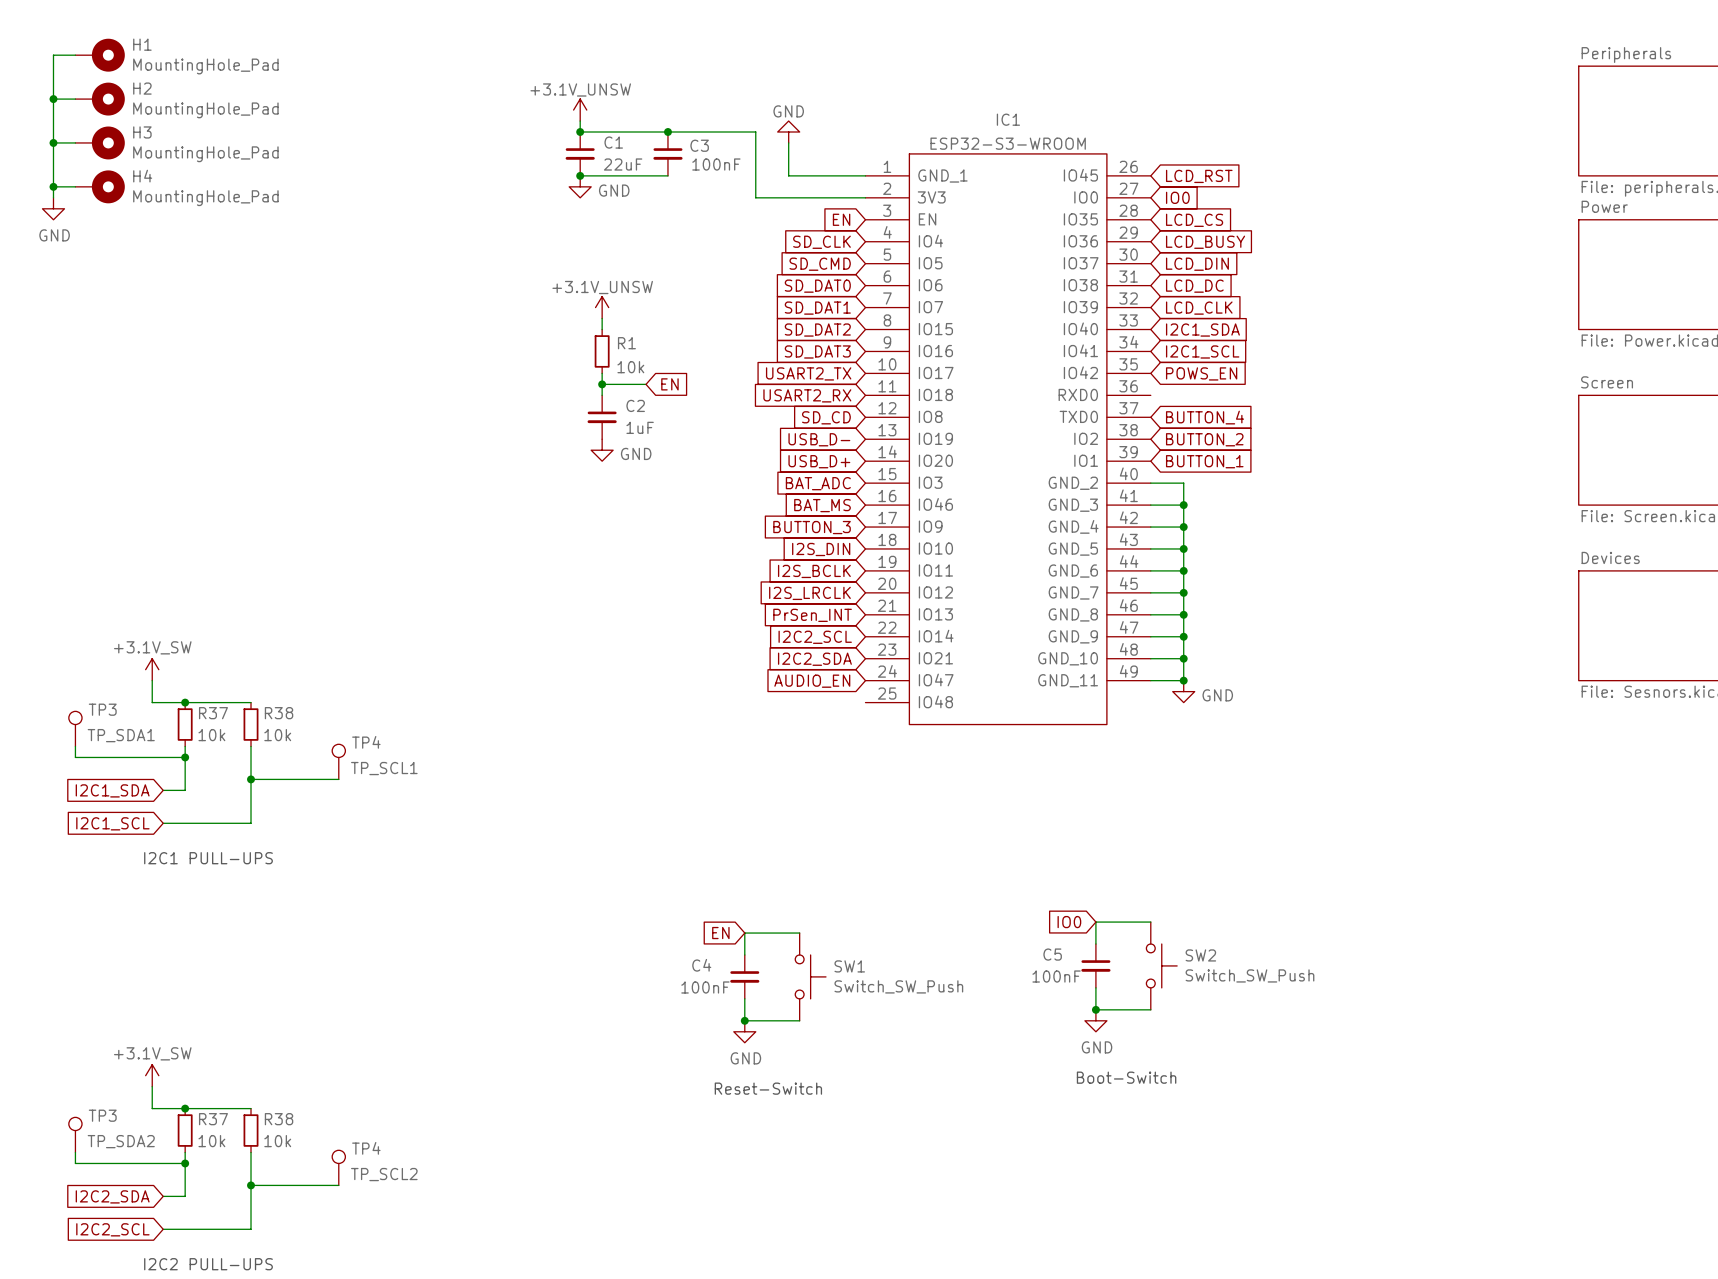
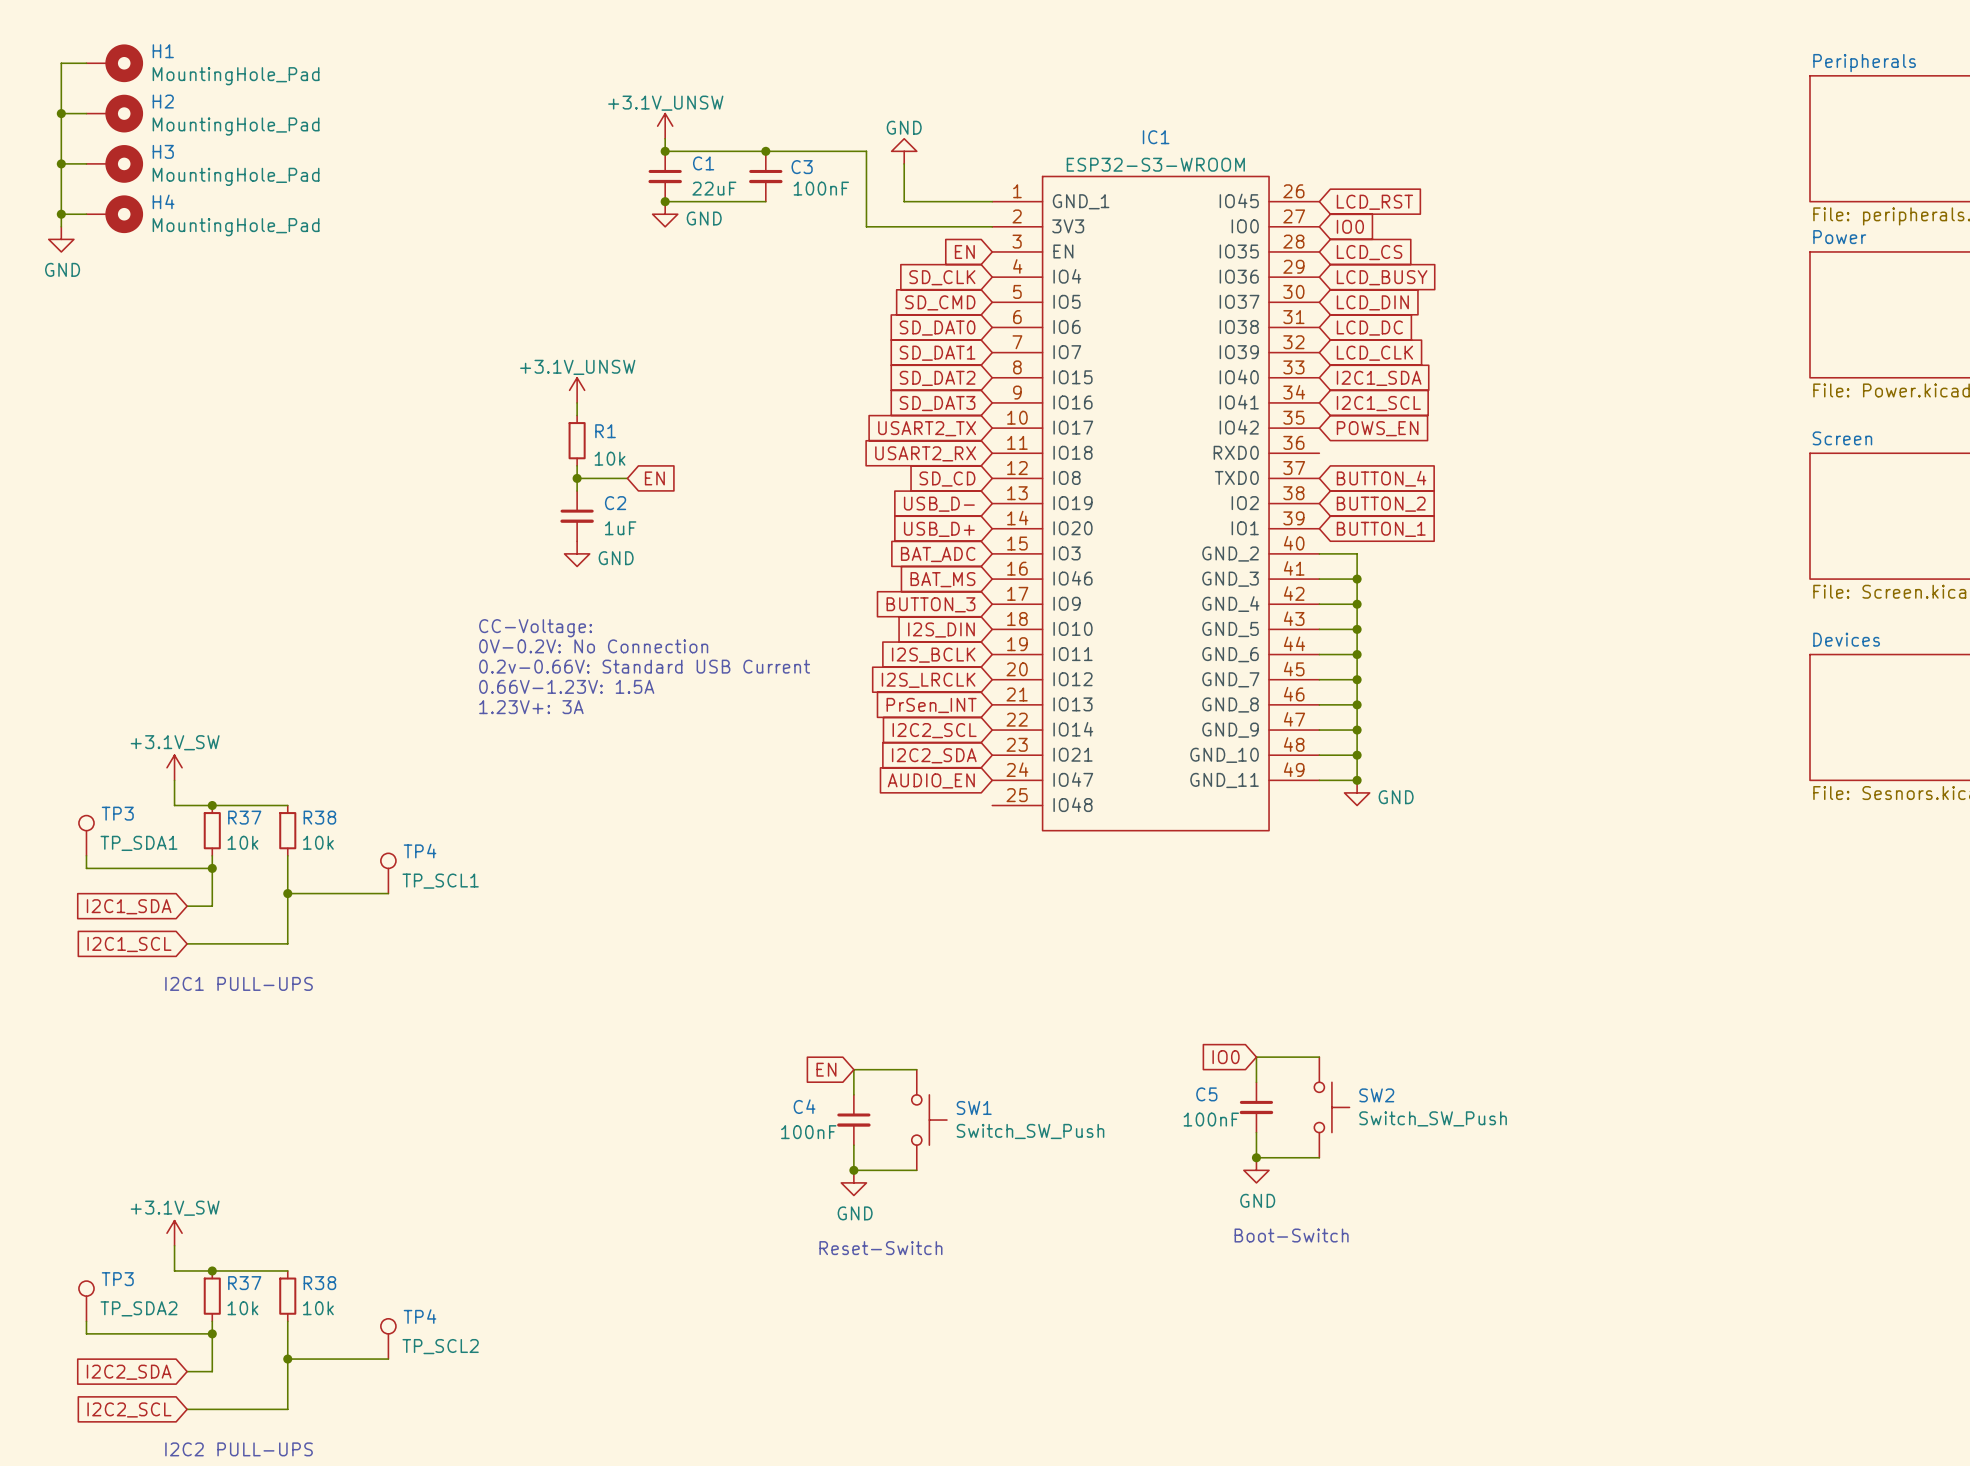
power symbol position: +3.1V_UNSW (602, 307) -> +3.1V_UNSW (577, 390)
wire: (602, 318) (602, 329) -> (577, 402) (577, 415)
R1 position: (602, 351) -> (577, 440)
wire: (602, 373) (602, 395) -> (577, 465) (577, 491)
wire: (602, 384) (646, 384) -> (577, 478) (627, 478)
junction: (602, 384) -> none
global label position: EN (669, 384) -> EN (654, 478)
junction: none -> (577, 478)
C2 position: (602, 417) -> (577, 516)
power symbol position: GND (602, 450) -> GND (577, 553)
text: none -> CC-Voltage: (535, 628)
text: none -> 0V-0.2V: No Connection (593, 646)
text: none -> 0.2v-0.66V: Standard USB Current (644, 666)
text: none -> 0.66V-1.23V: 1.5A (566, 686)
text: none -> 1.23V+: 3A (531, 707)

